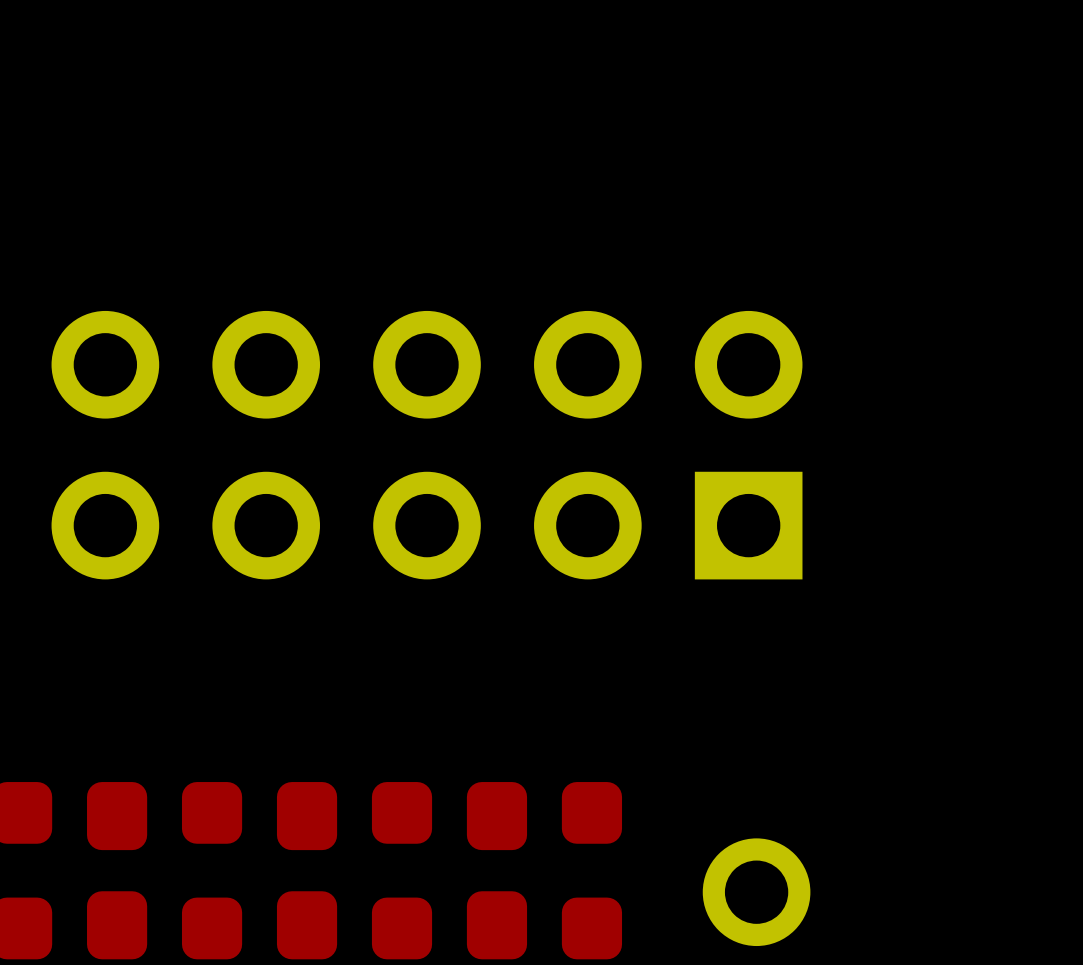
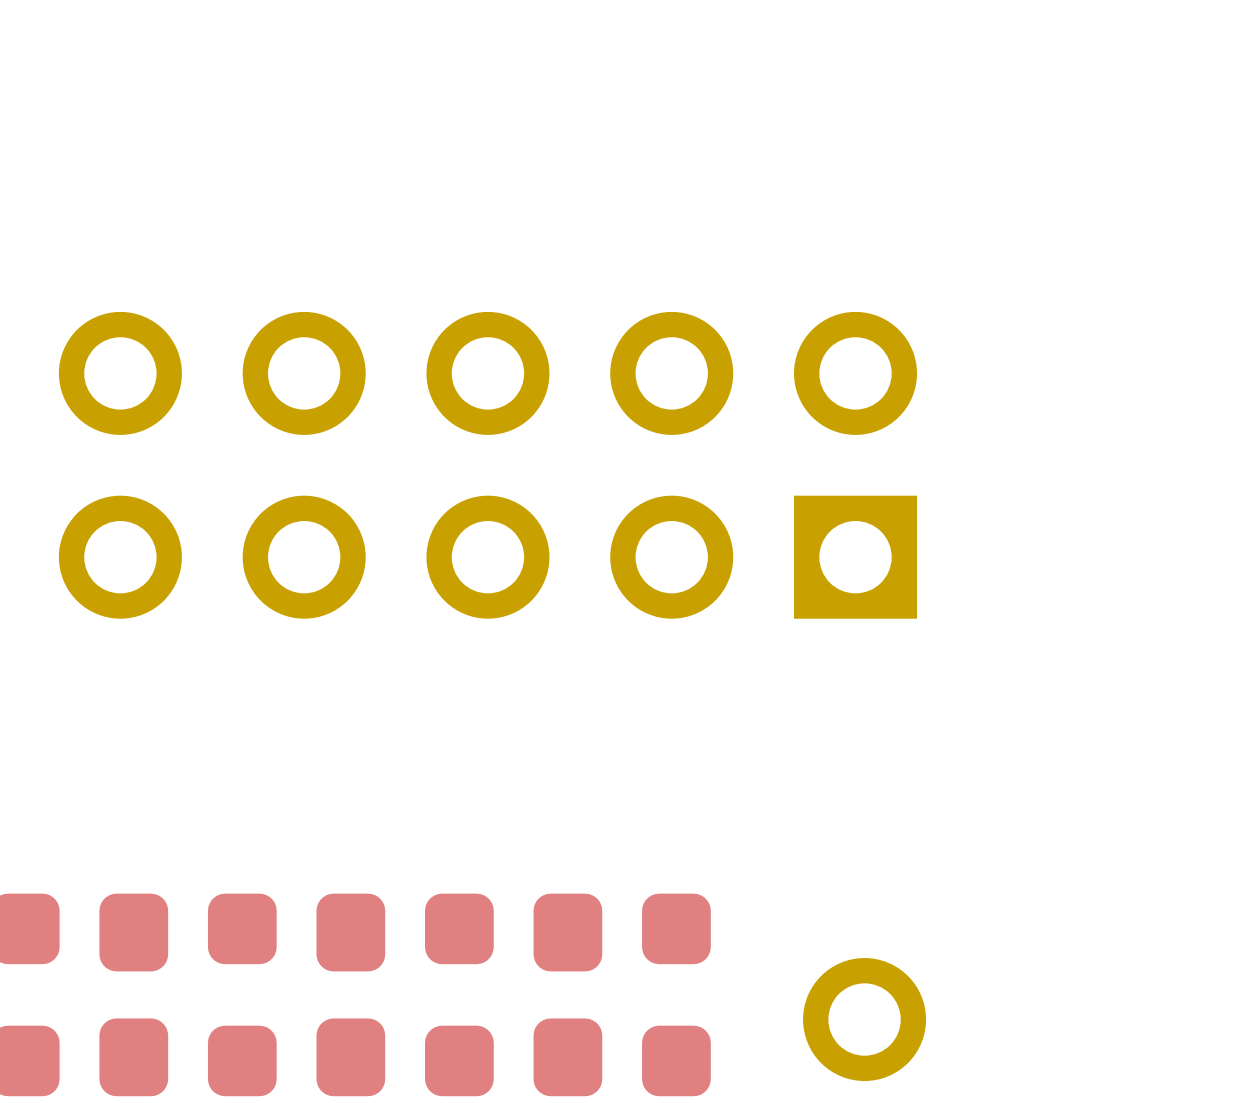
part position: (427, 445) -> (487, 465)

